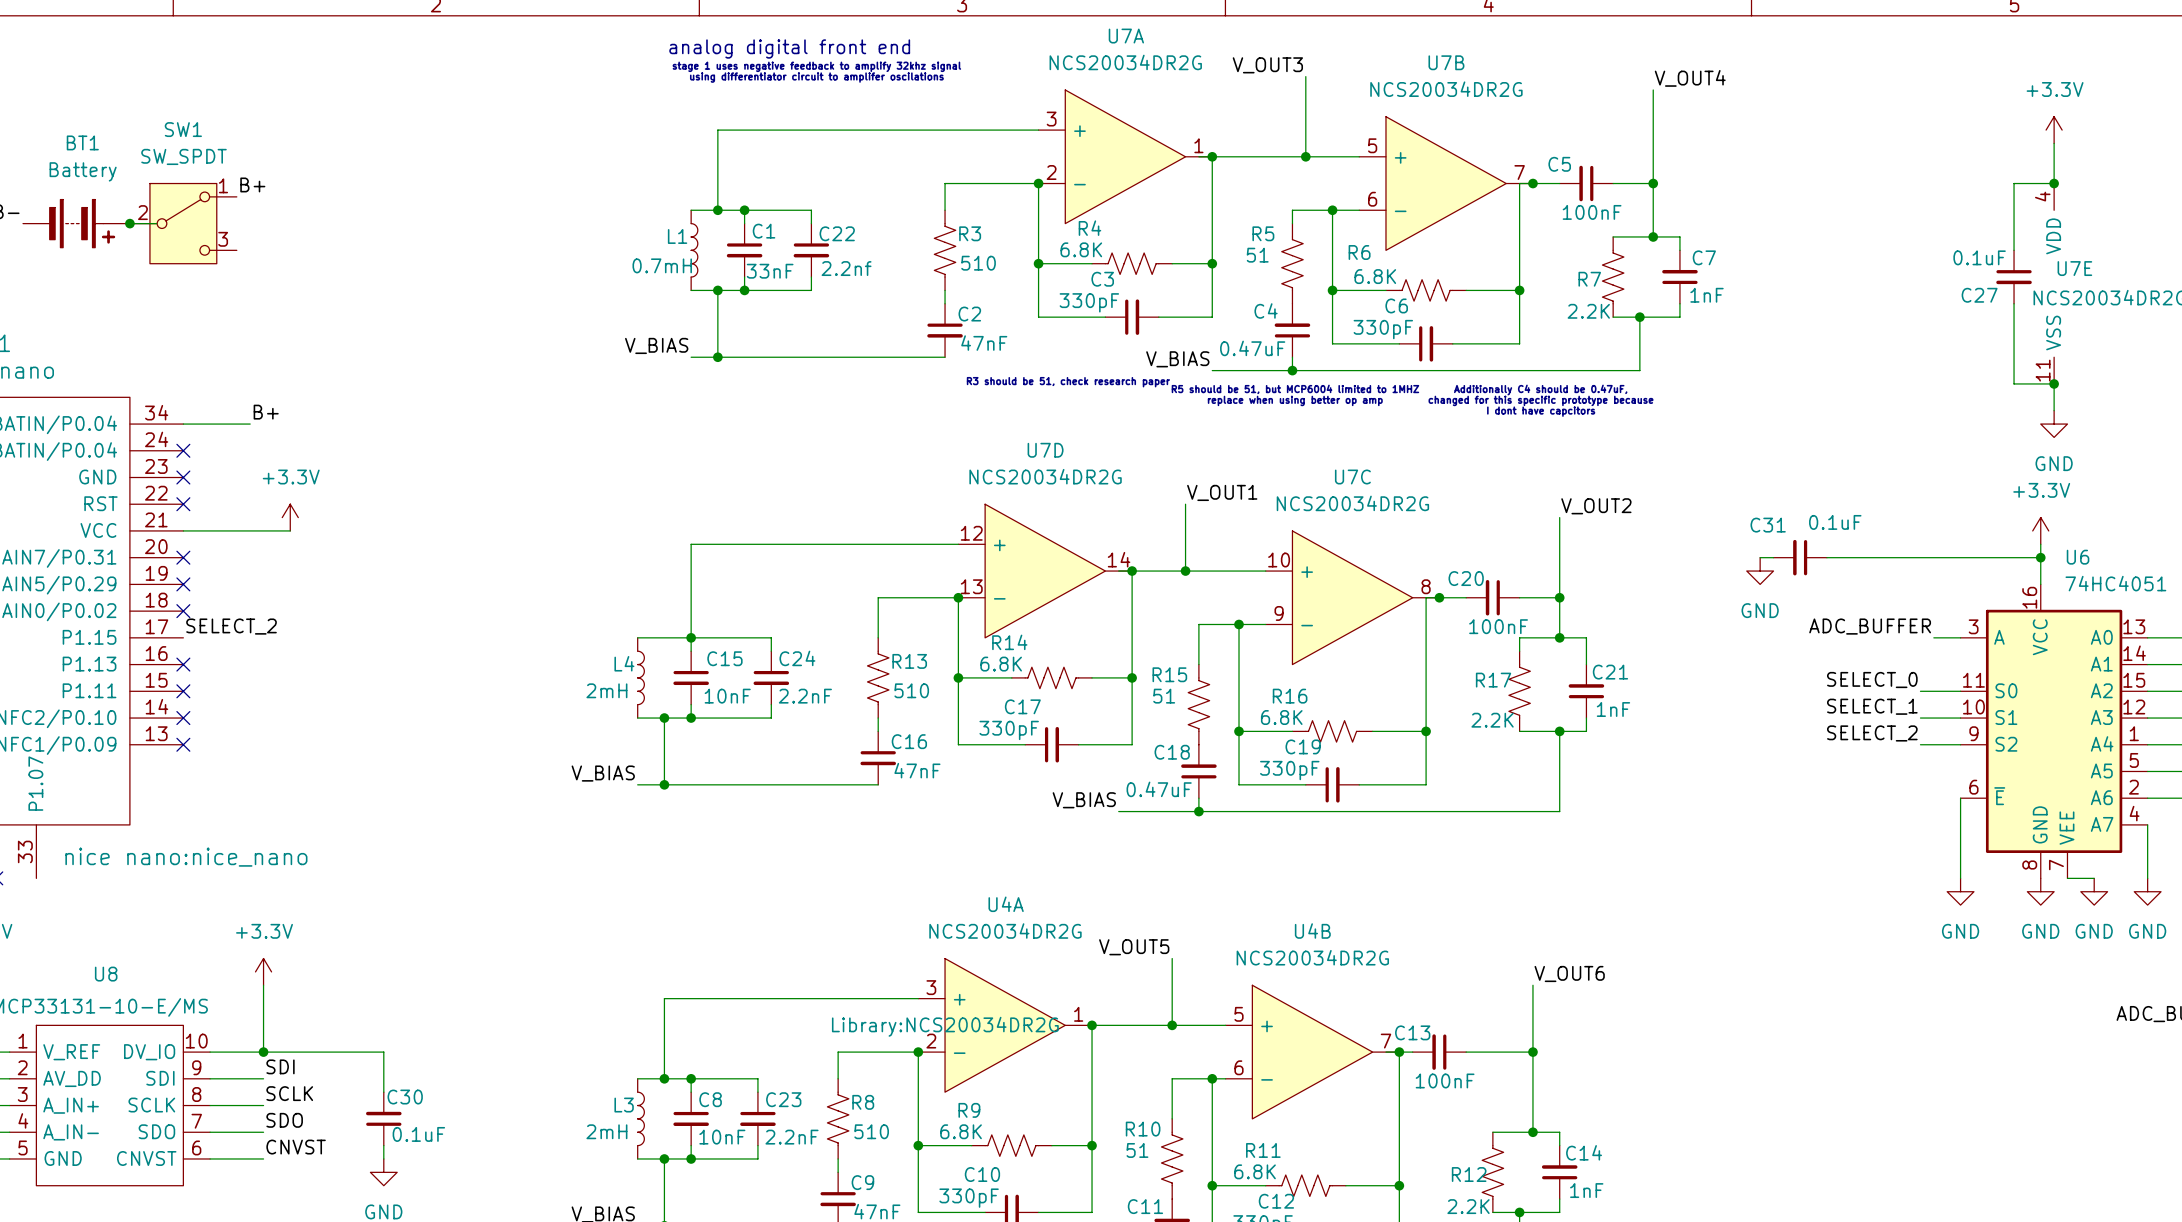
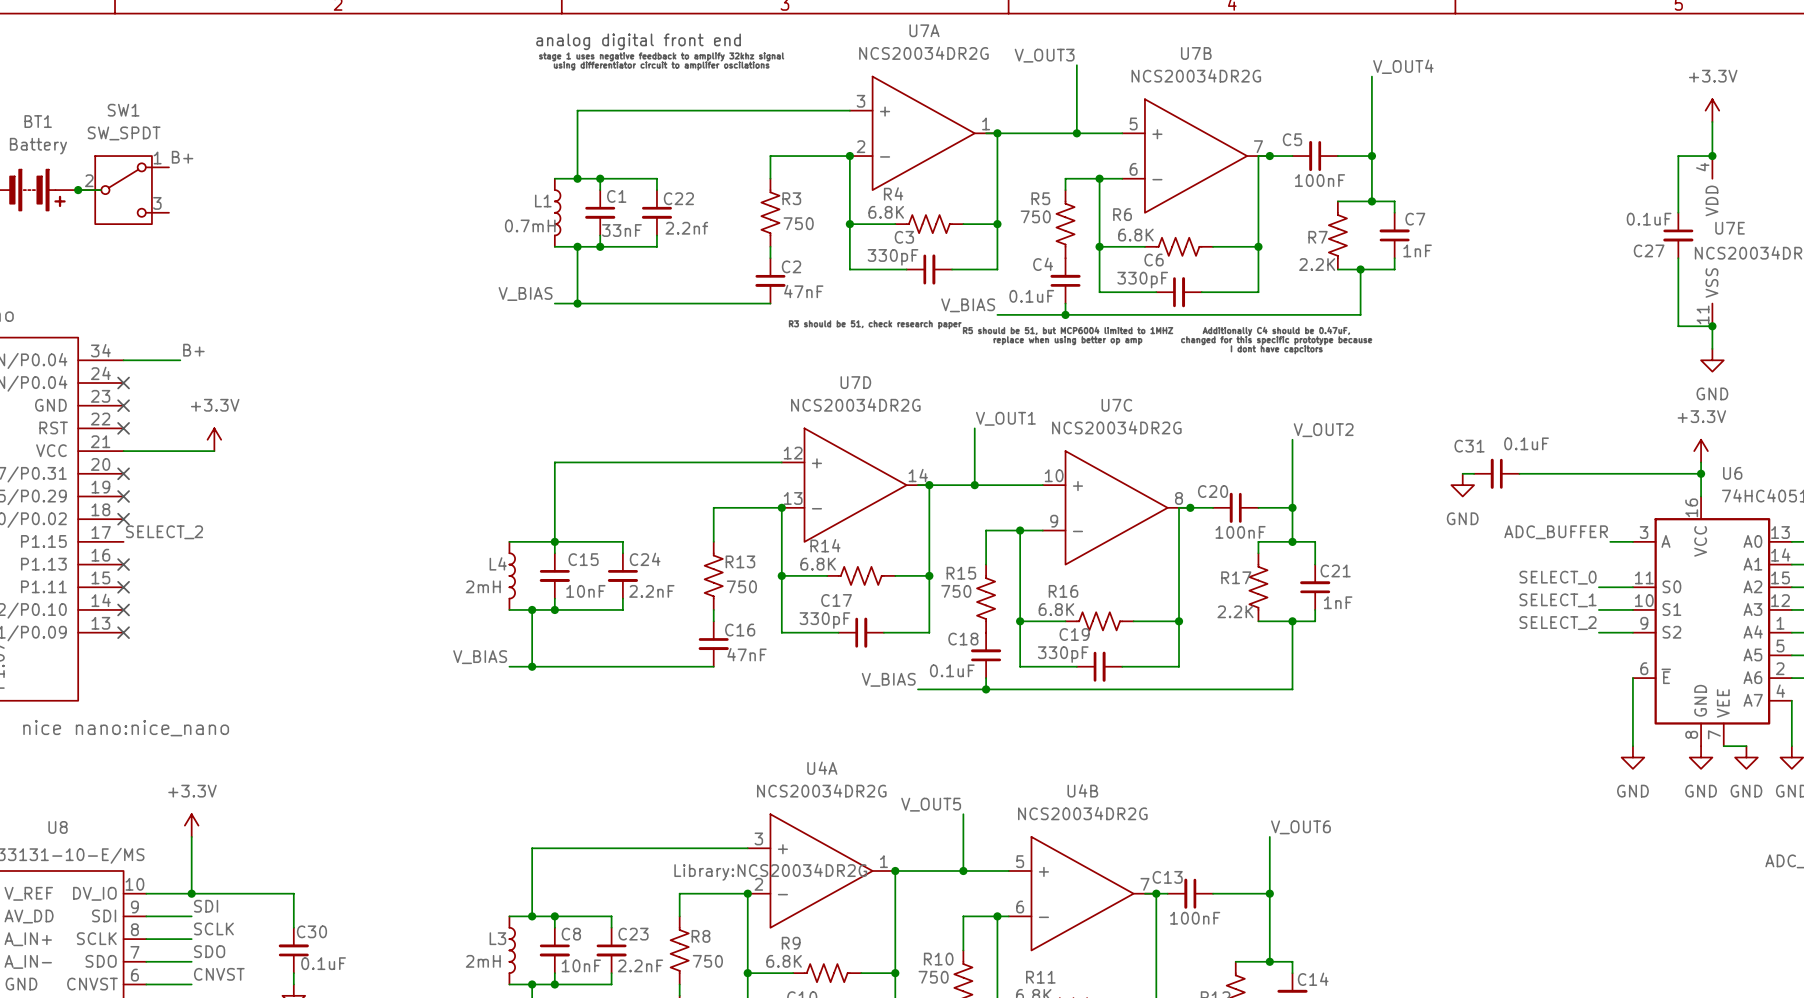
R5 value: 51 (1257, 255) -> 750 (1035, 216)
R3 value: 510 (978, 263) -> 750 (798, 223)
C4 value: 0.47uF (1252, 348) -> 0.1uF (1031, 296)
R13 value: 510 (911, 690) -> 750 (741, 586)
R15 value: 51 (1164, 696) -> 750 (956, 591)
C18 value: 0.47uF (1159, 789) -> 0.1uF (952, 670)
R8 value: 510 (871, 1131) -> 750 (707, 961)
R10 value: 51 (1137, 1150) -> 750 (933, 977)

